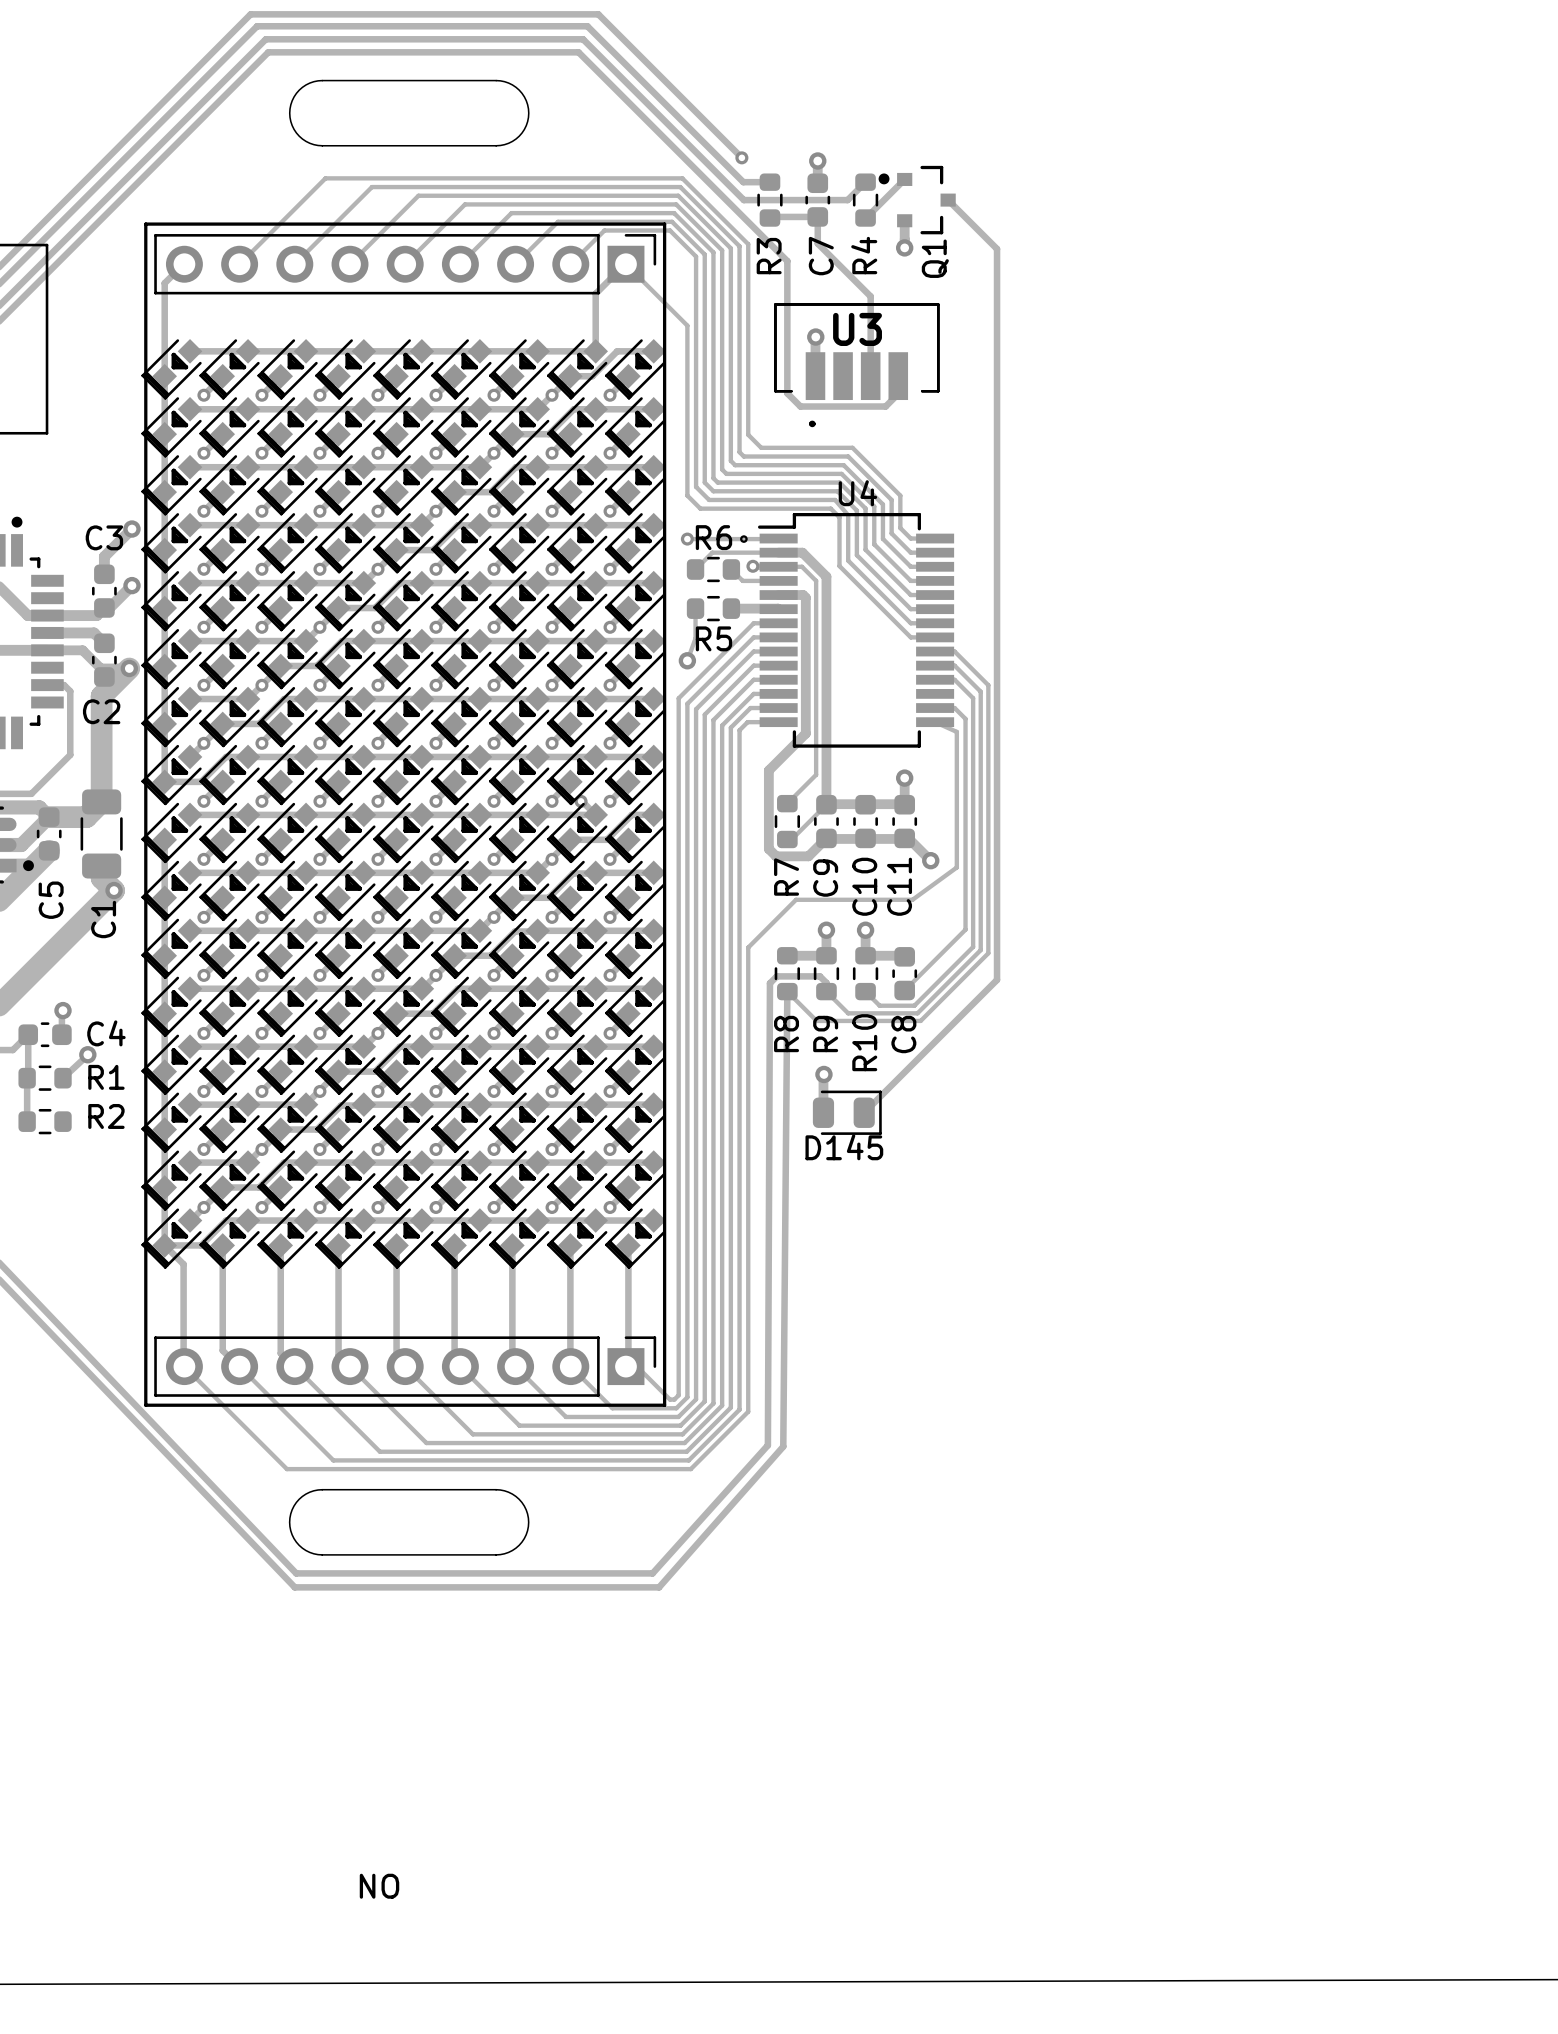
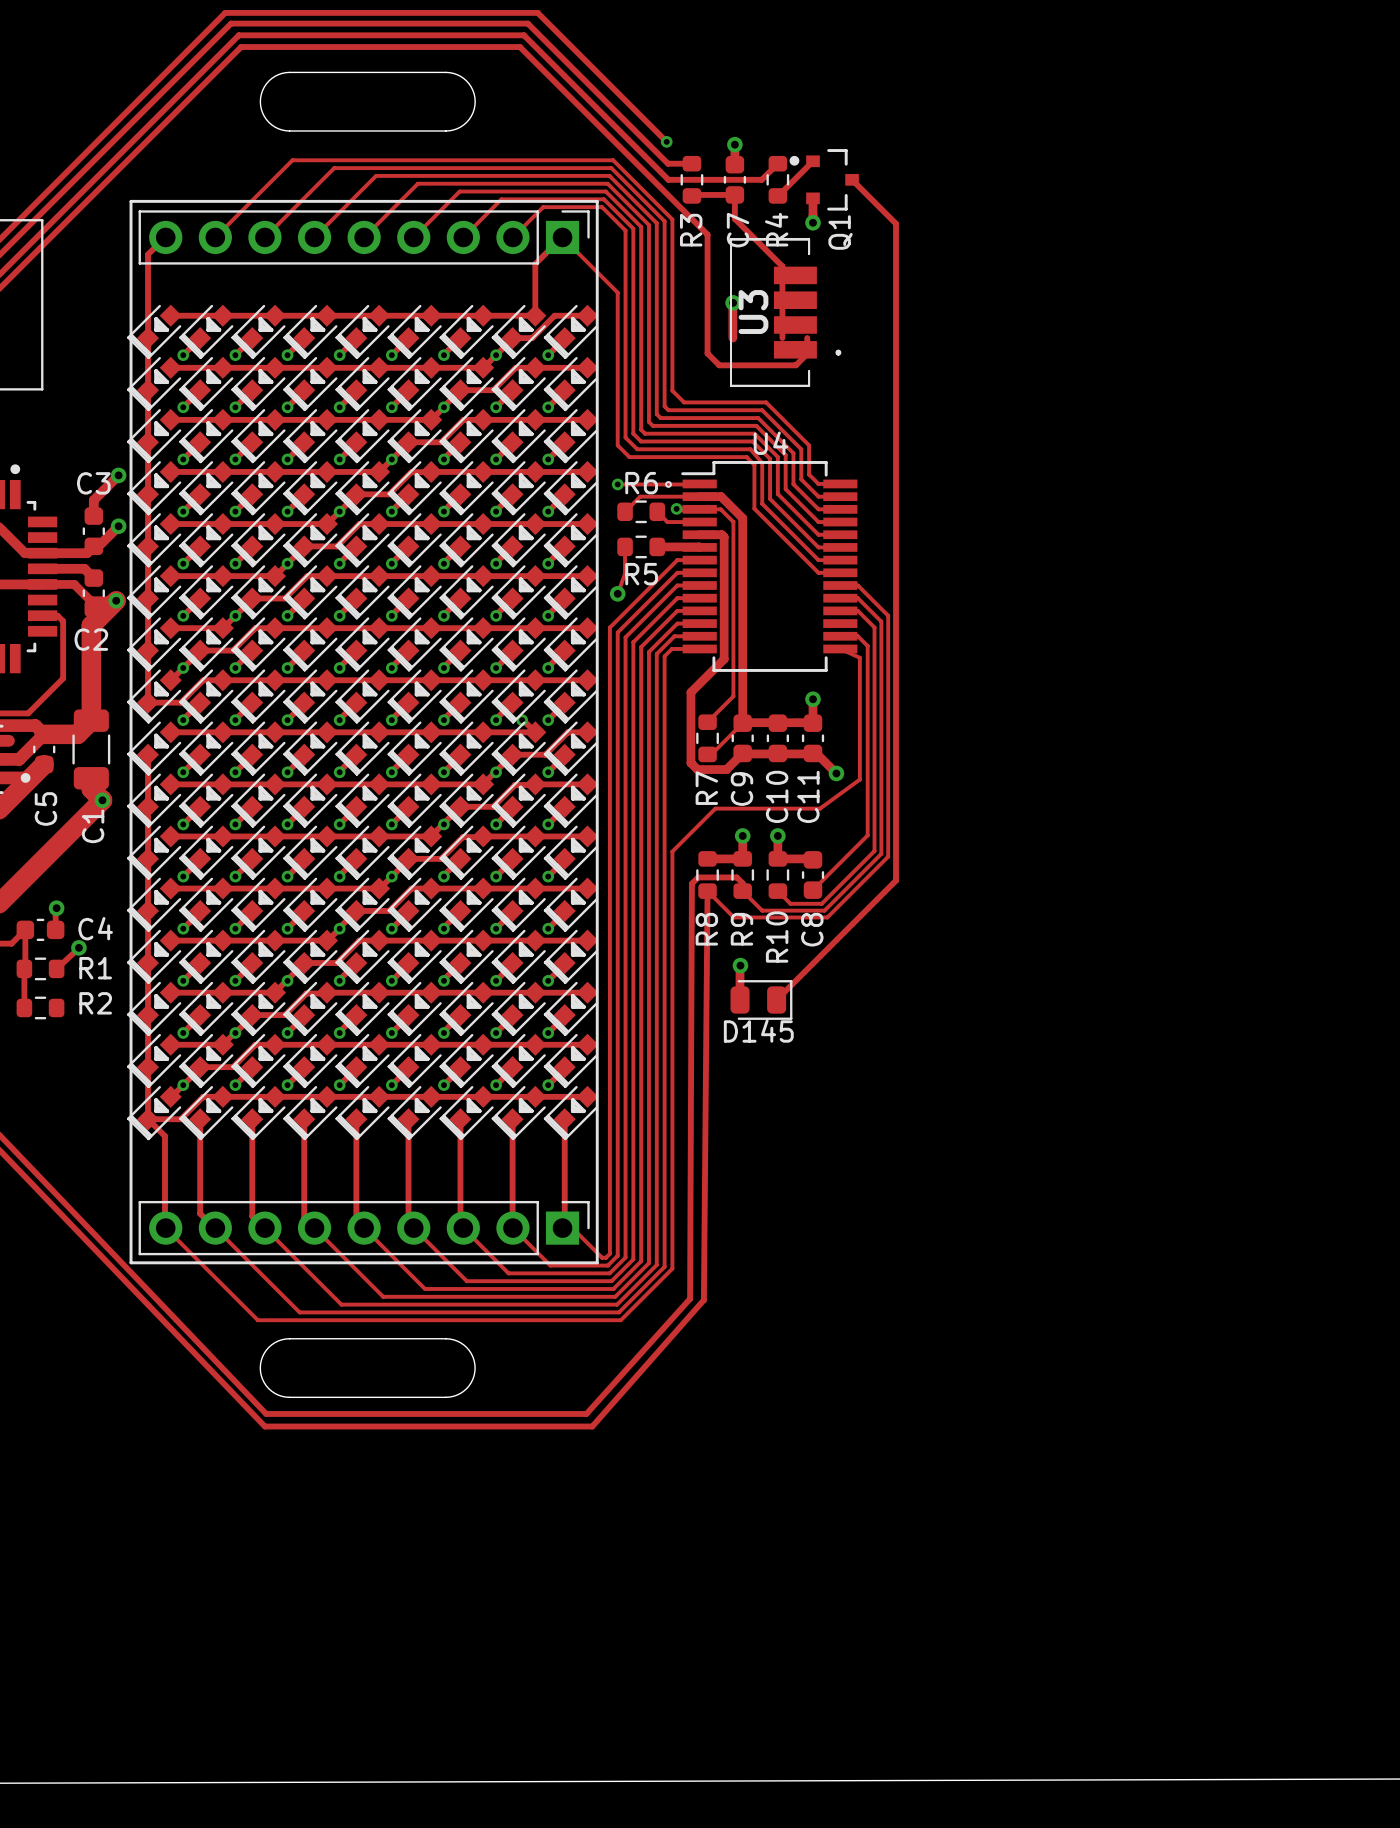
U3 rotation: 0° (856, 365) -> 90° counterclockwise (785, 312)
text: ON (379, 1886) -> none

